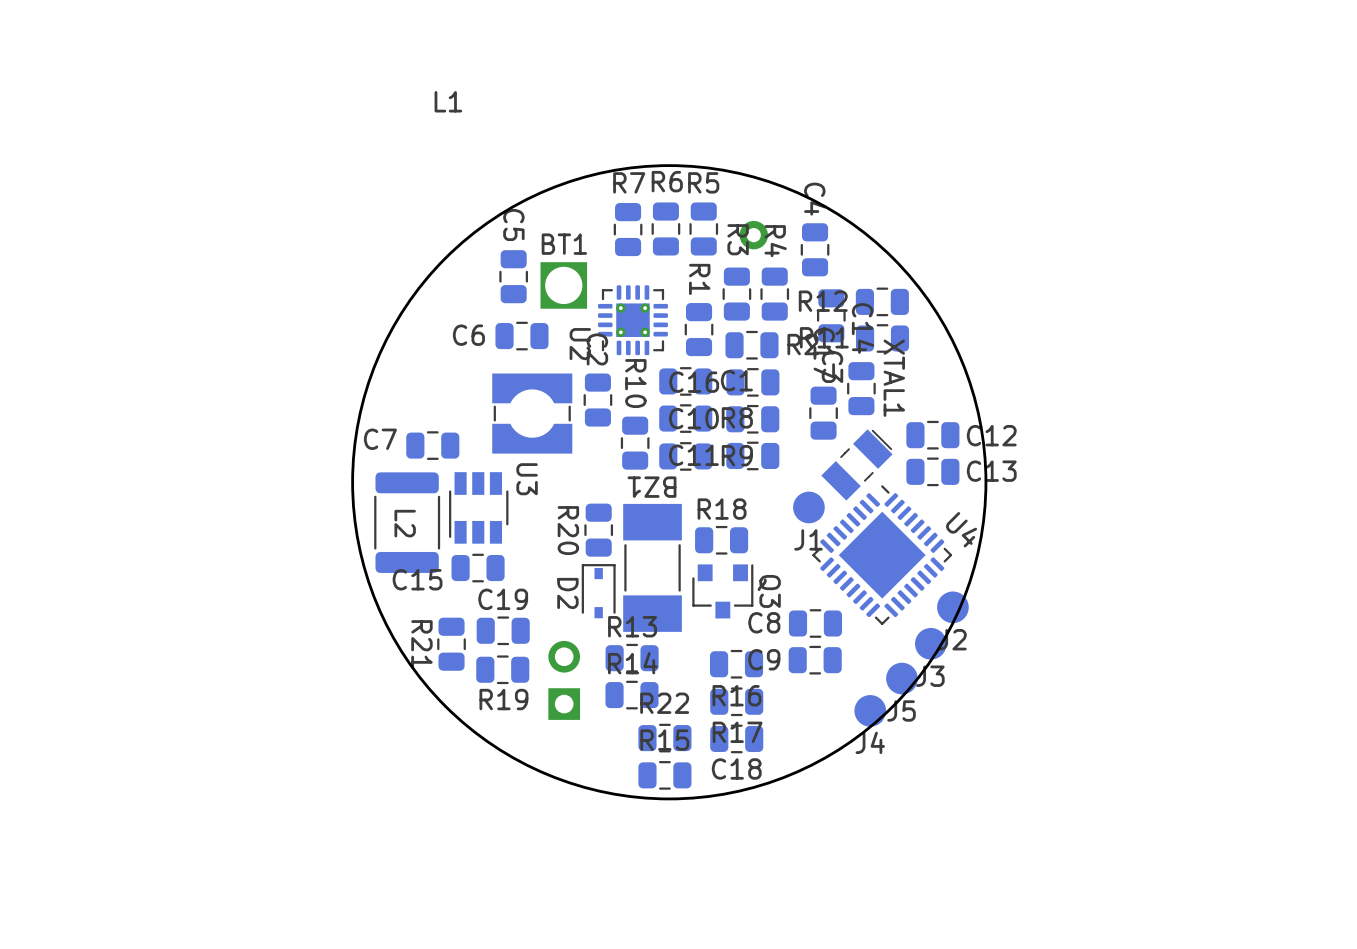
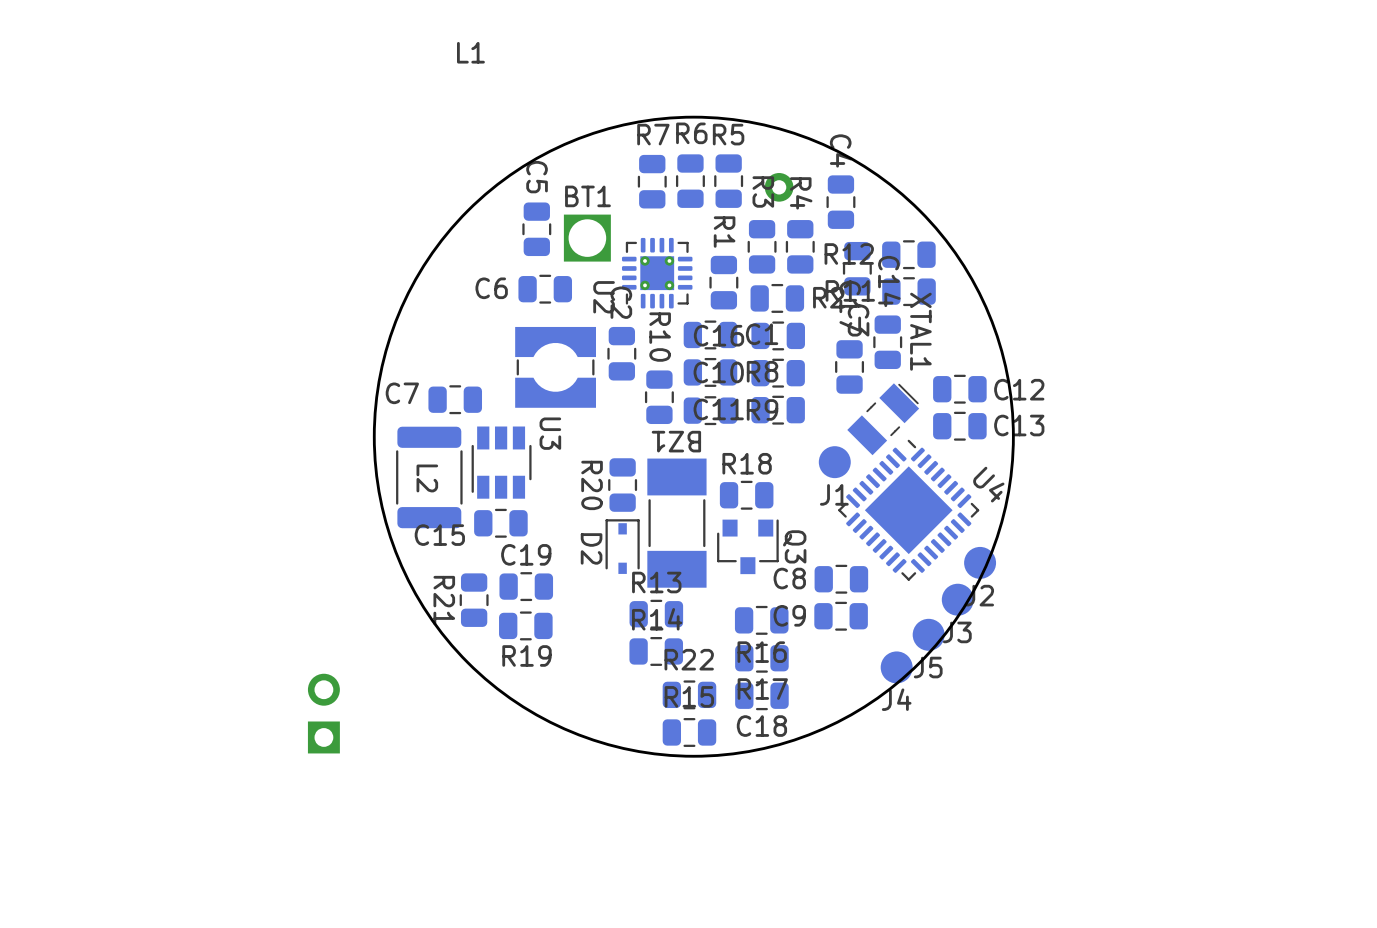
part position: (564, 680) -> (323, 713)

